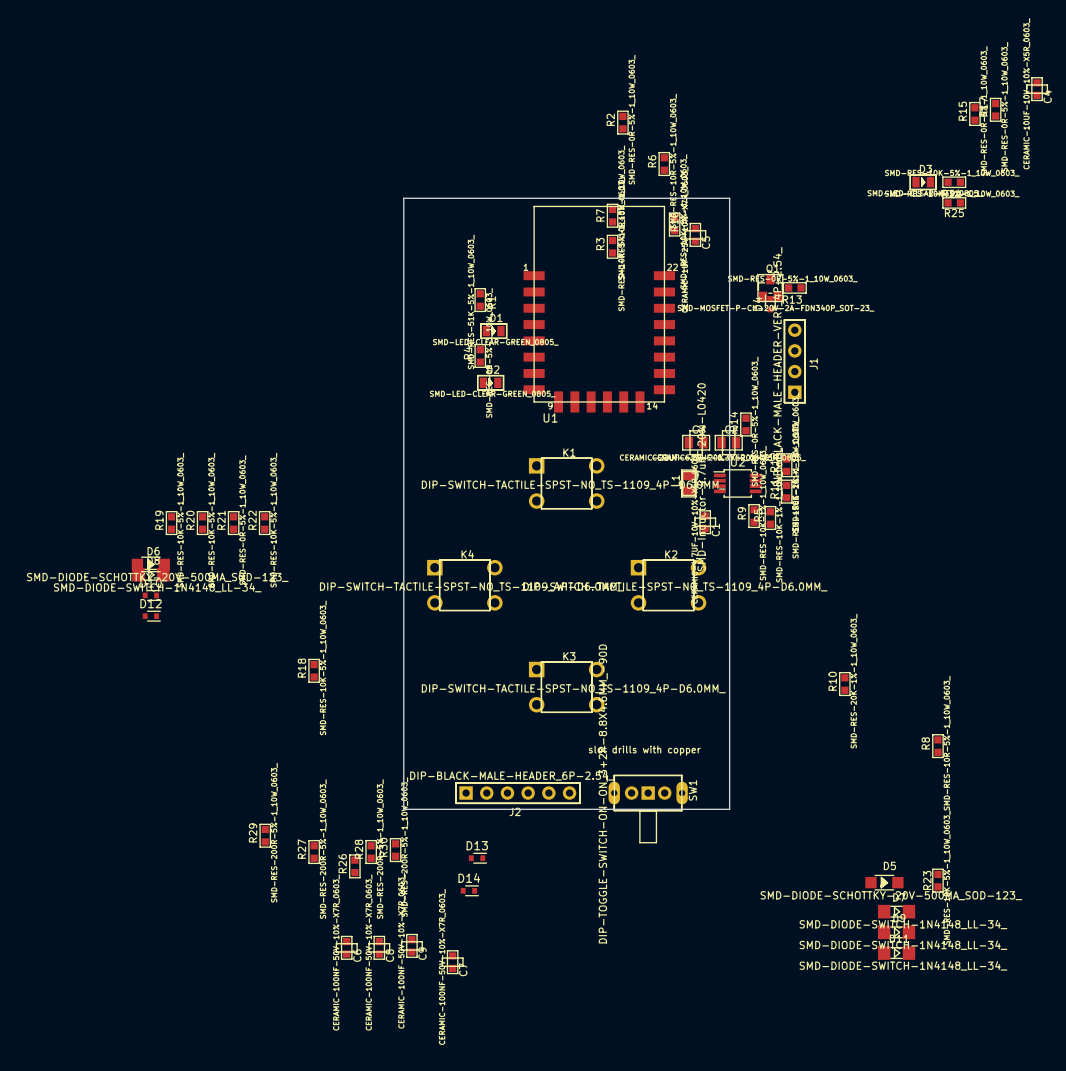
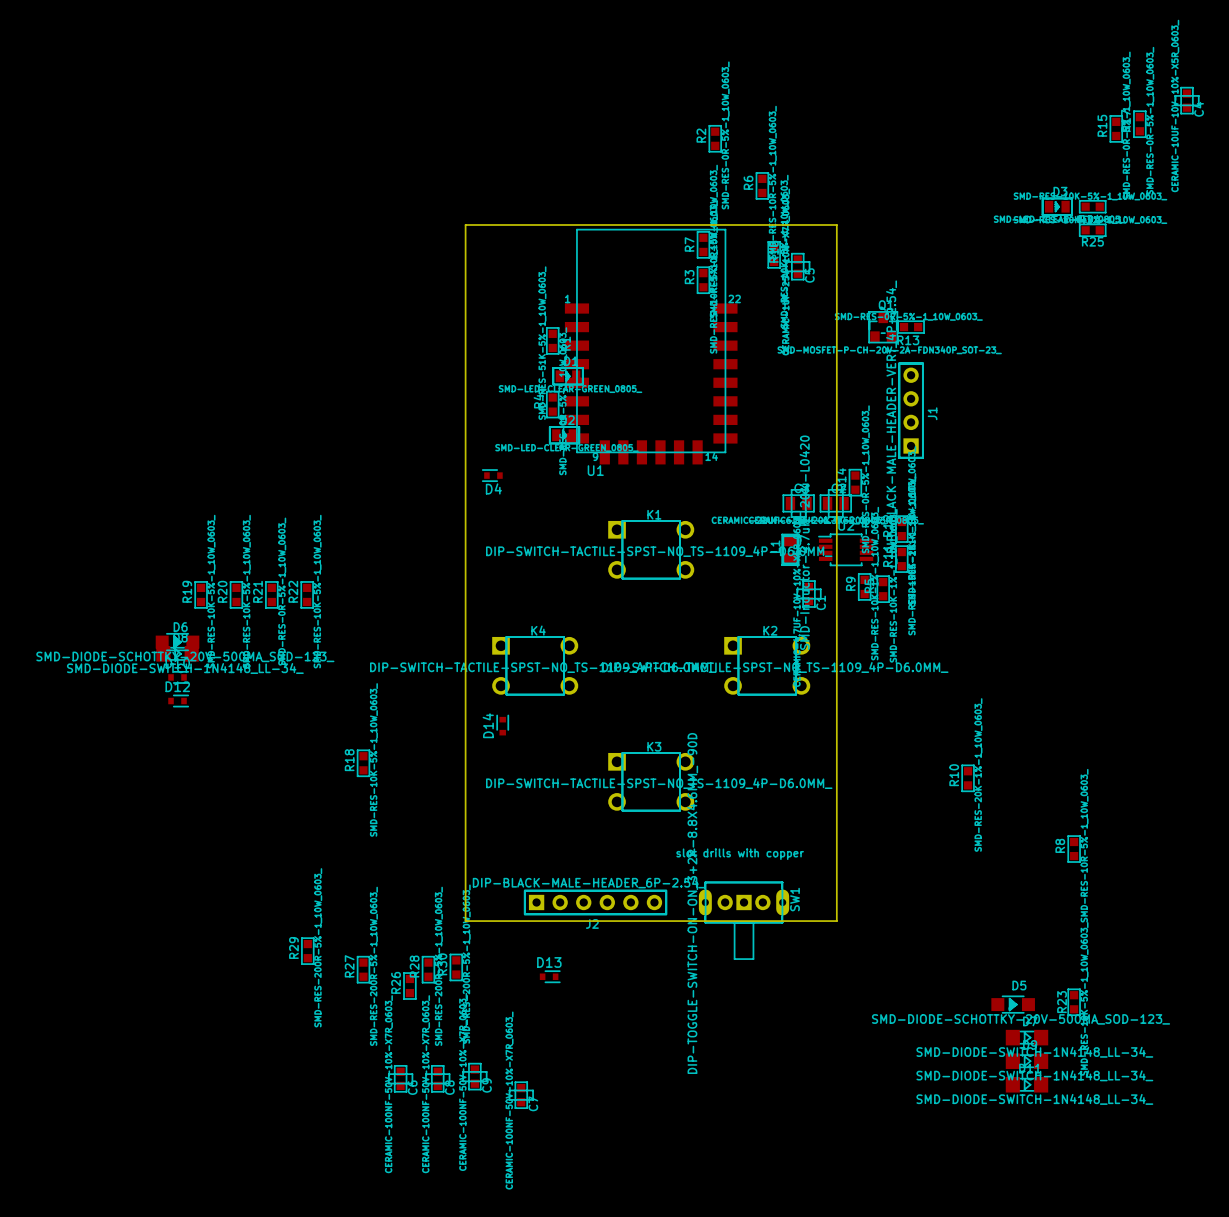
D4 rotation: 0° (770, 303) -> 90° counterclockwise (492, 475)
D4 position: (770, 303) -> (492, 475)
U1 position: (599, 309) -> (651, 346)
D14 rotation: 0° (469, 890) -> 90° counterclockwise (502, 725)
D14 position: (469, 890) -> (502, 725)

